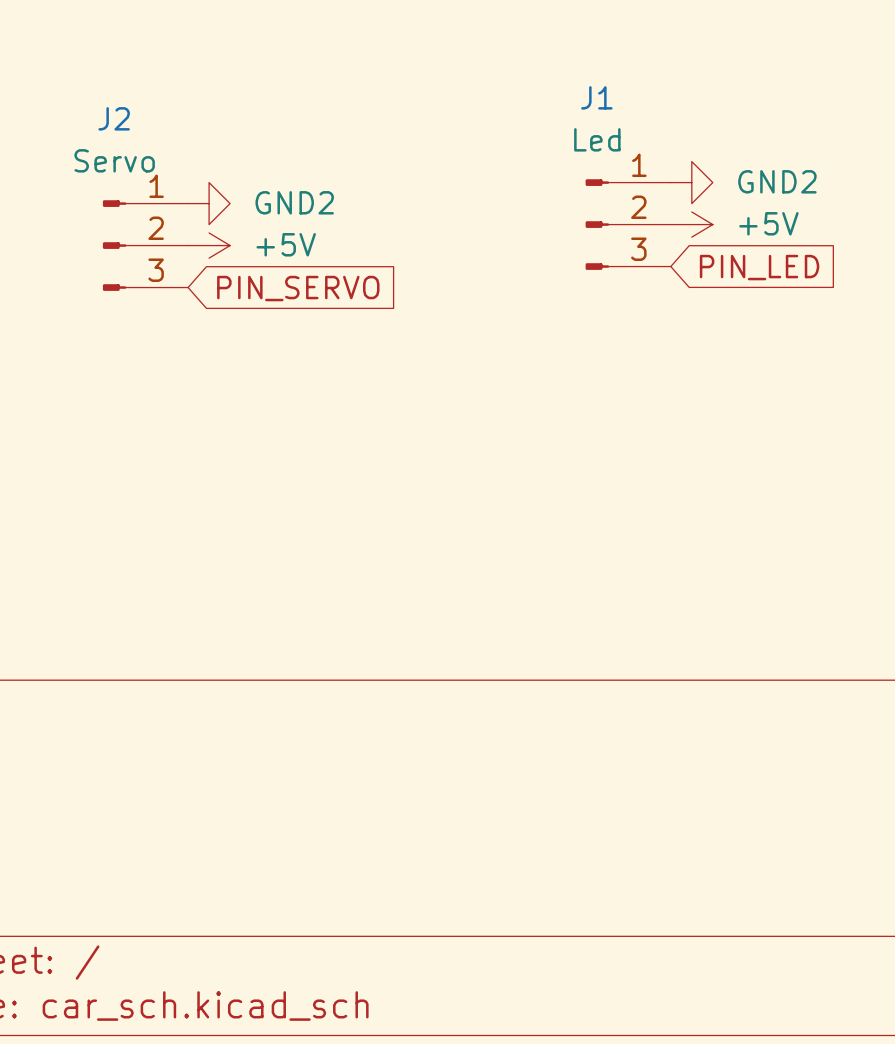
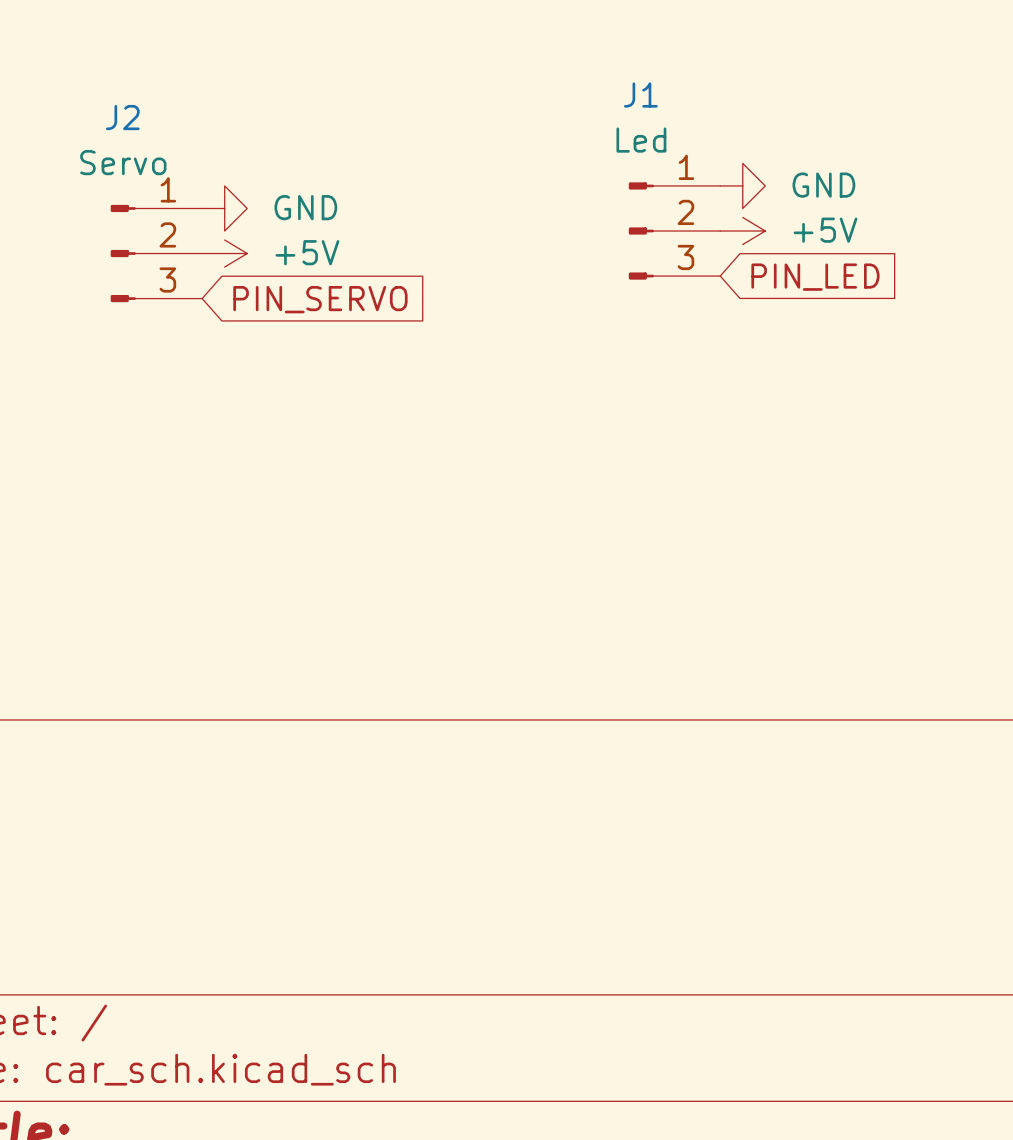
power symbol: GND2 (691, 182) -> GND (742, 185)
power symbol: GND2 (209, 203) -> GND (224, 208)

